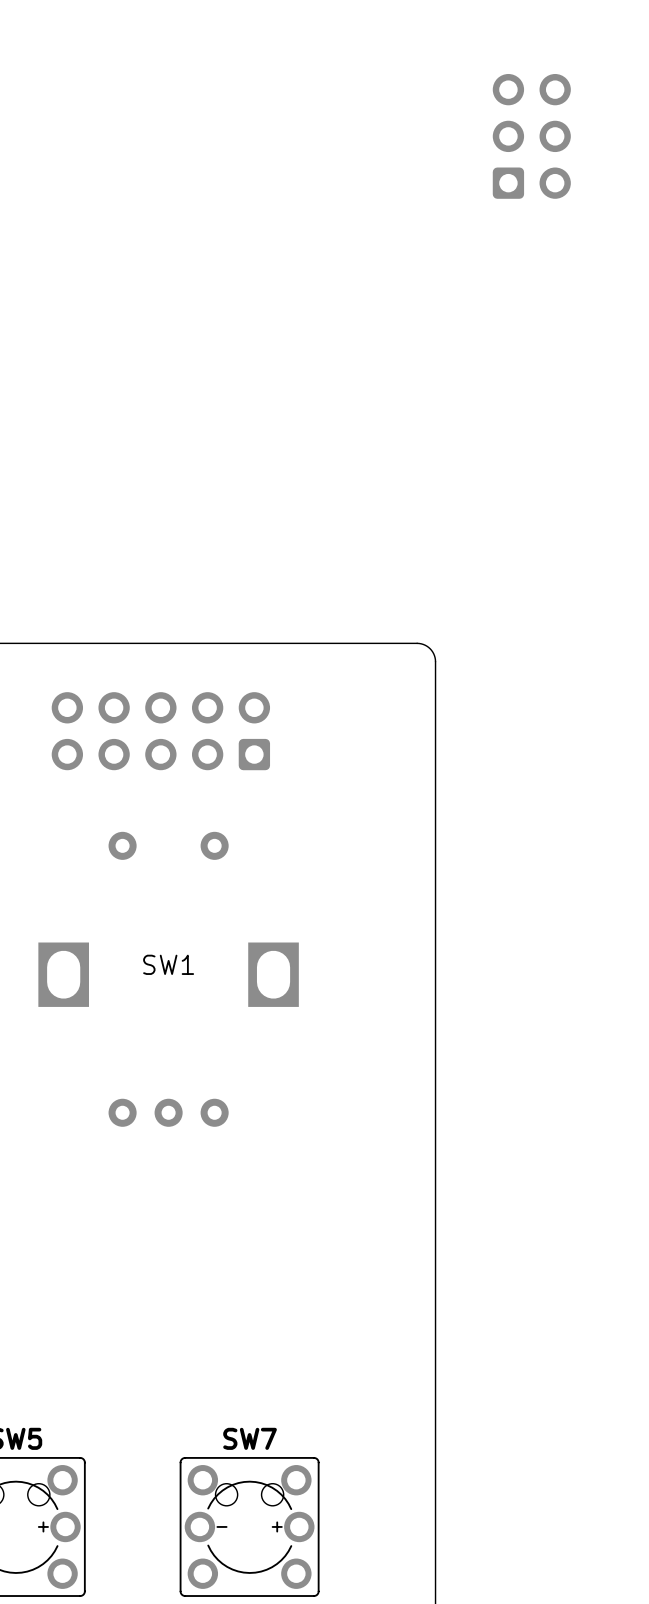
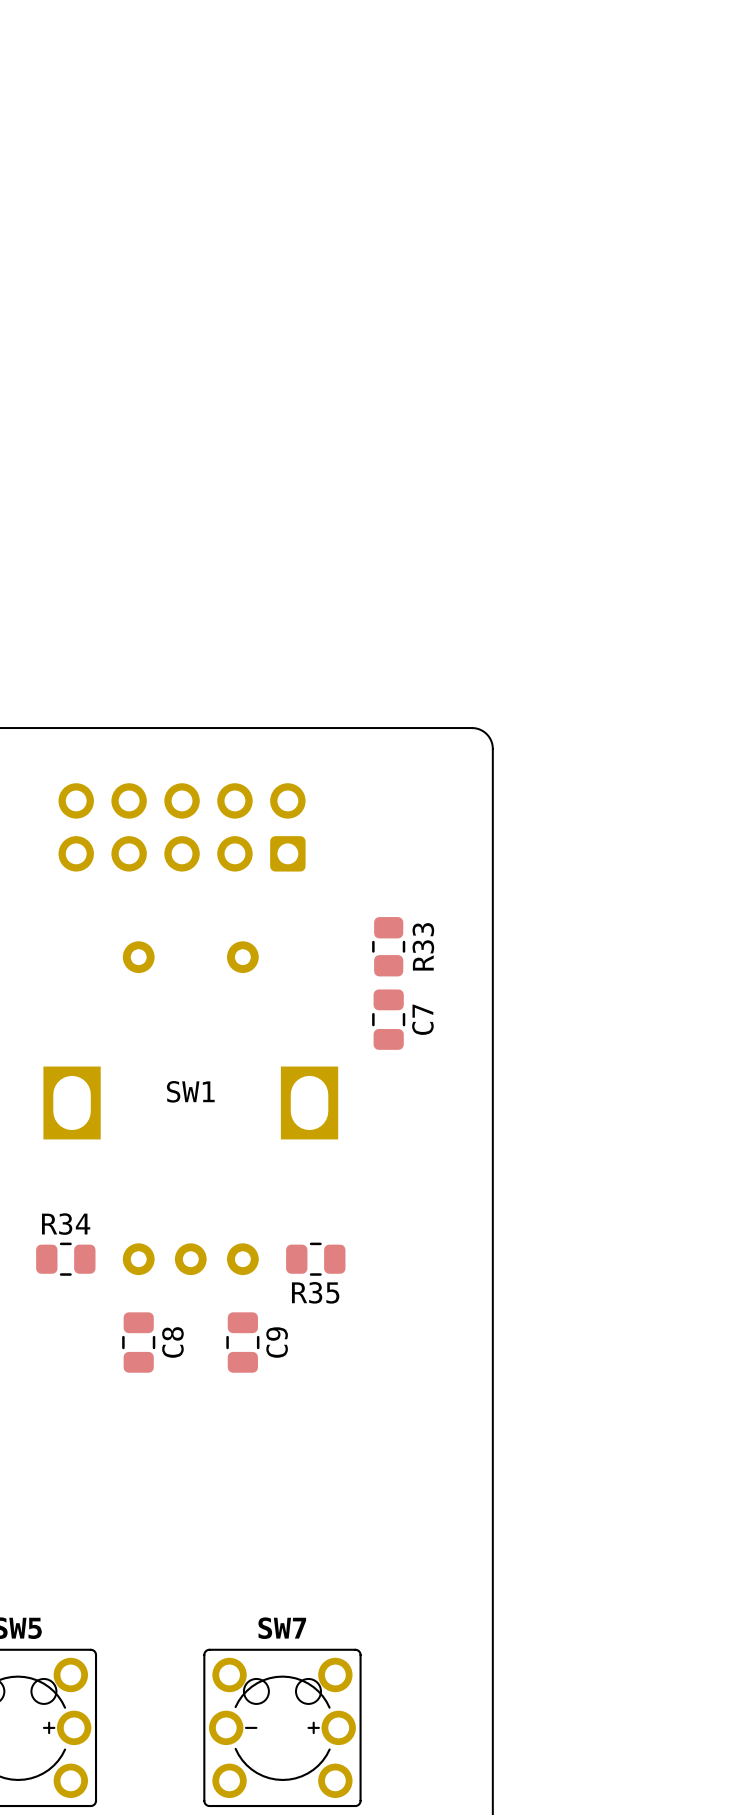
part: (531, 136) -> none
R33: none -> (388, 946)
C7: none -> (388, 1019)
R34: none -> (65, 1259)
R35: none -> (315, 1259)
C8: none -> (138, 1342)
C9: none -> (242, 1342)

